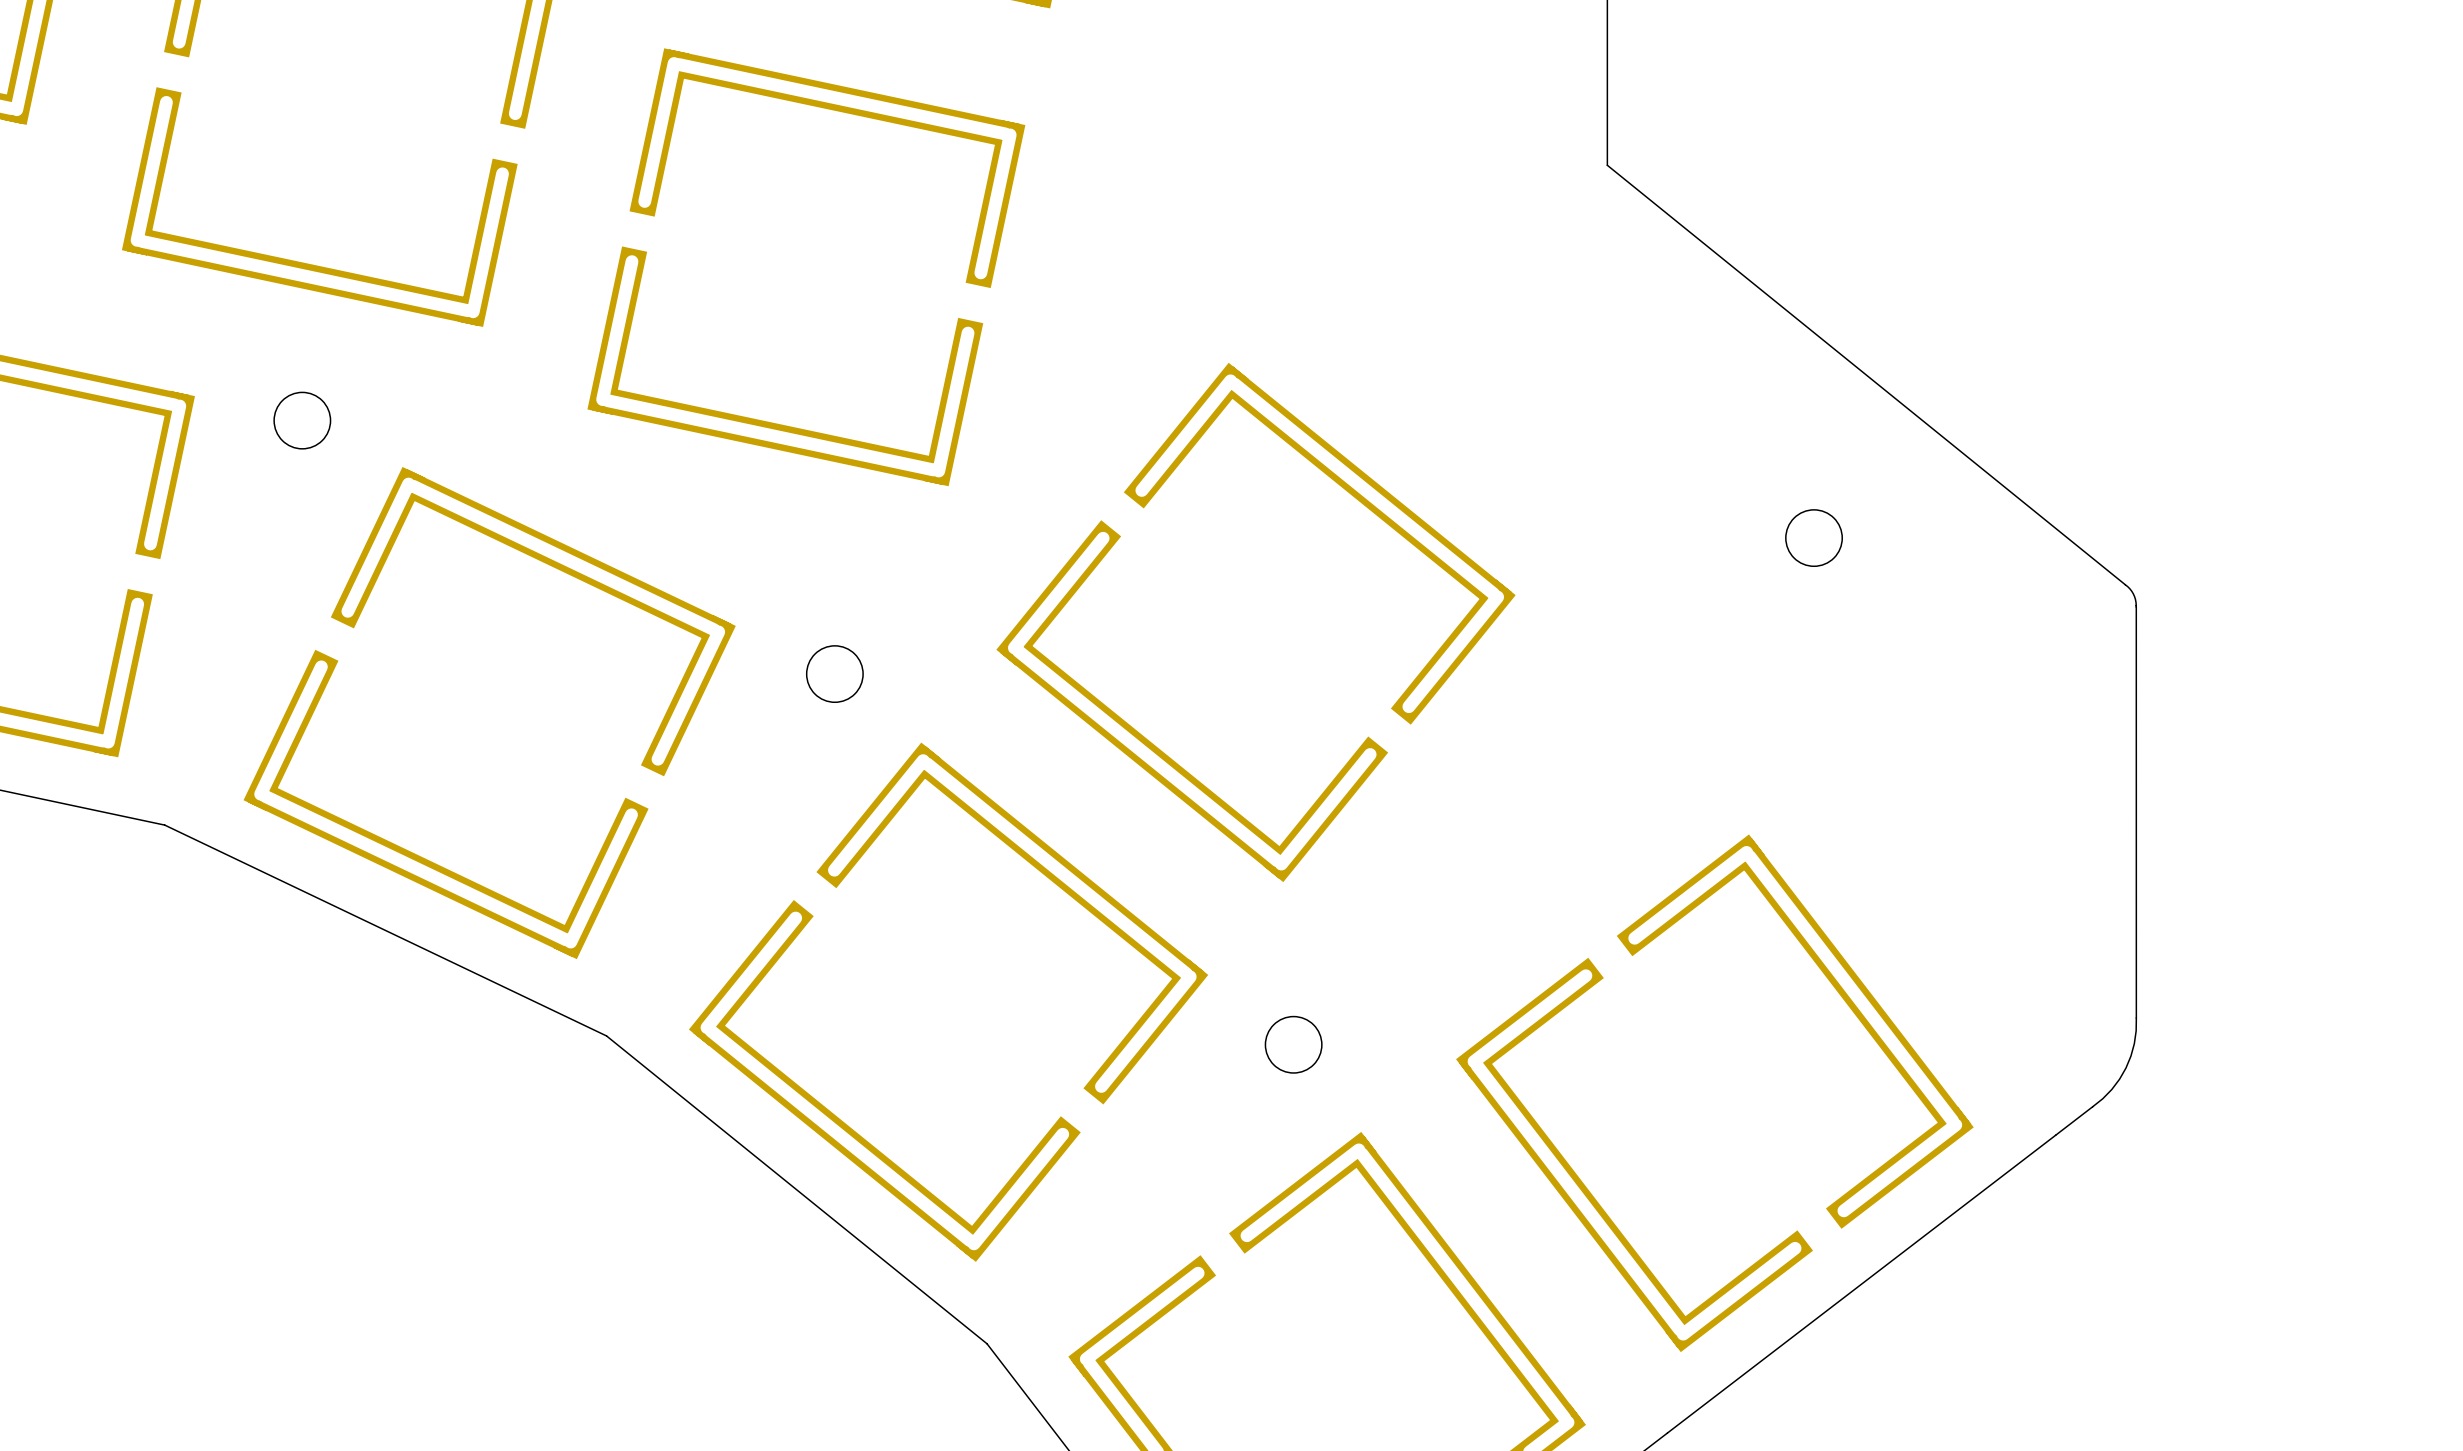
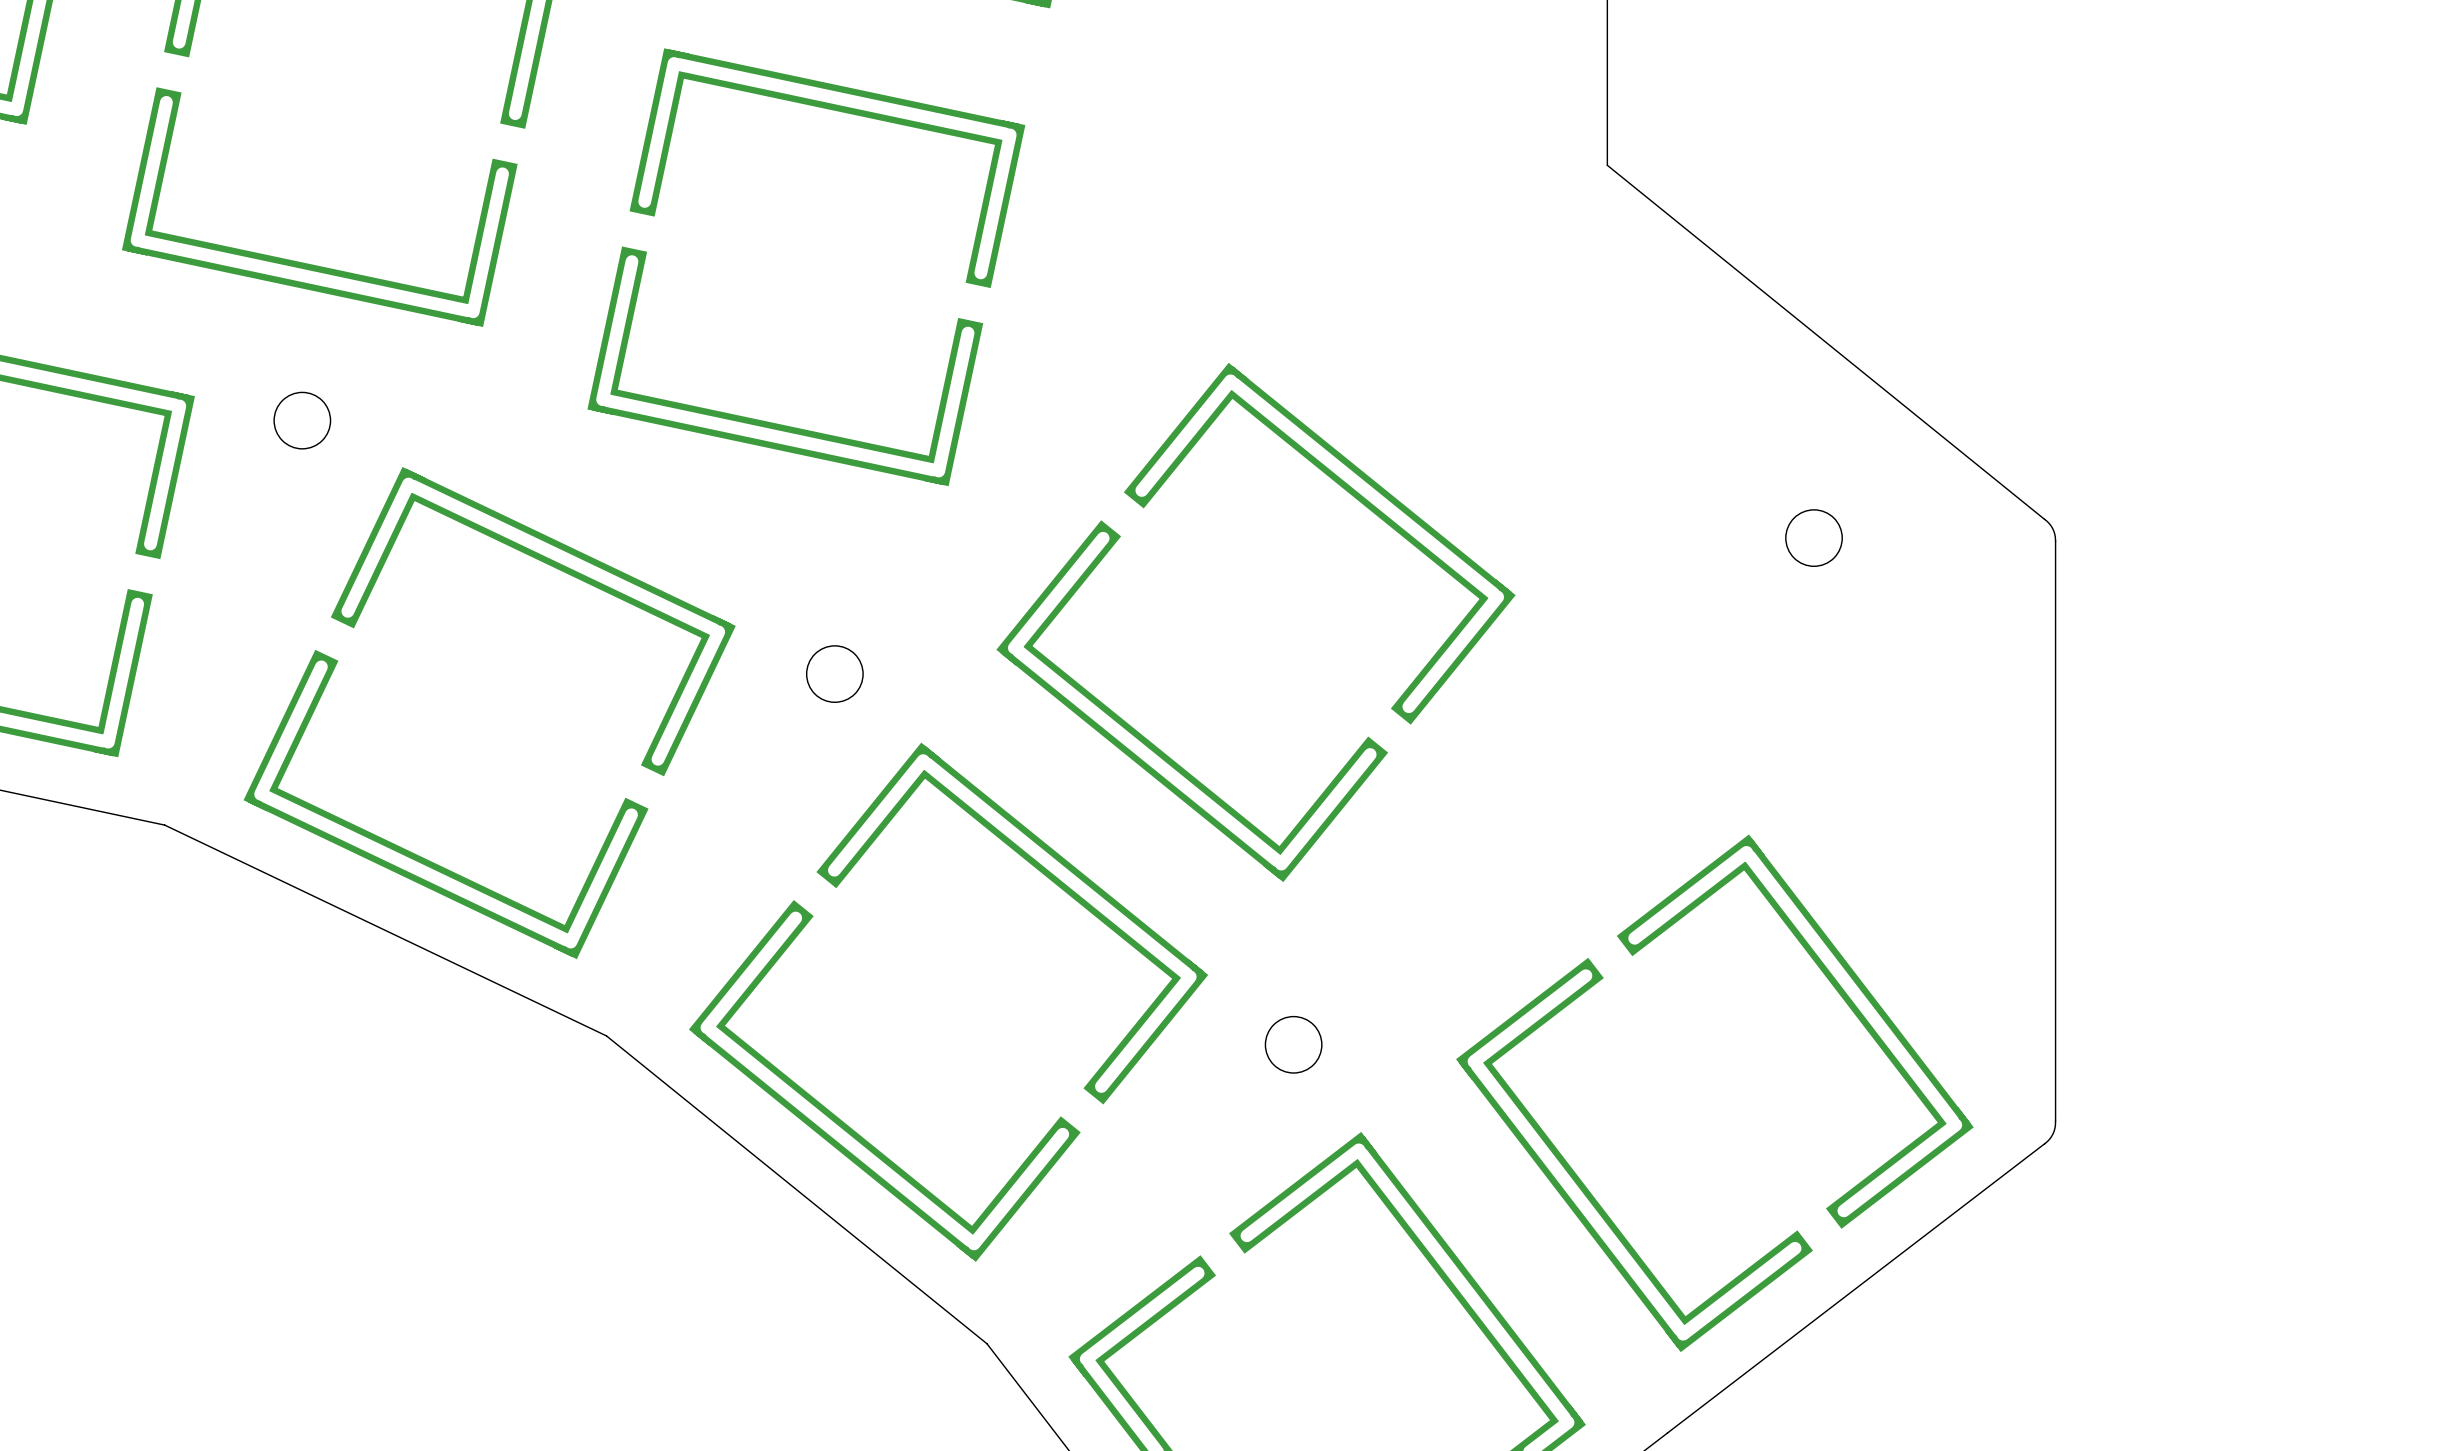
board edge: (1607, 165) (2127, 586) (2134, 596) (2136, 607) (2136, 1030) (2134, 1043) (2125, 1068) (2111, 1089) (2102, 1098) (1667, 1433) -> (1607, 165) (2046, 521) (2052, 528) (2055, 540) (2055, 1120) (2052, 1134) (2044, 1143) (1667, 1433)

